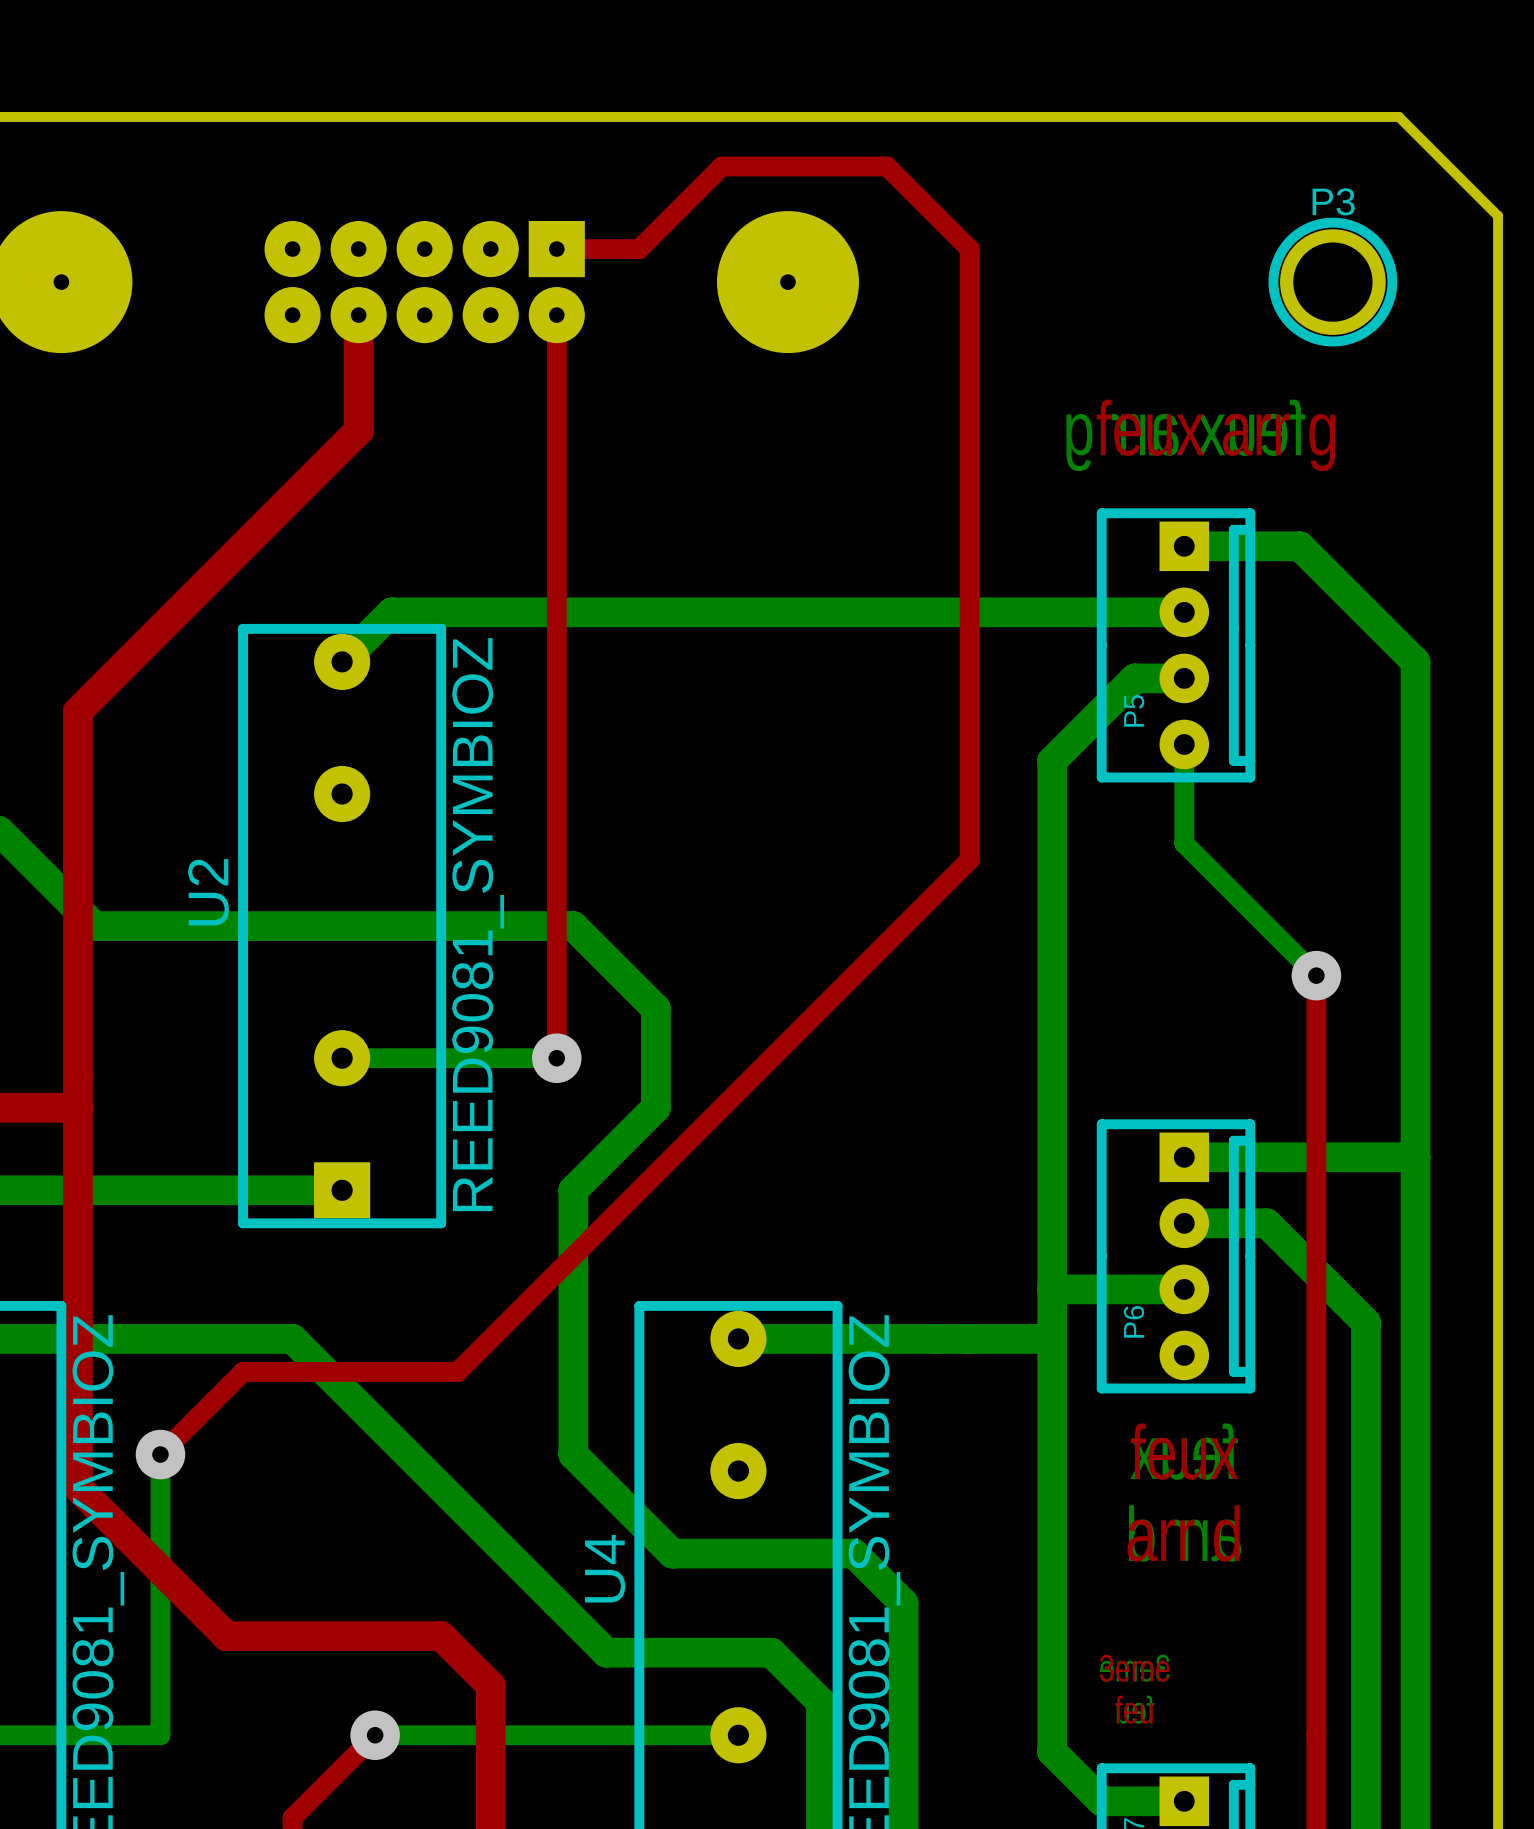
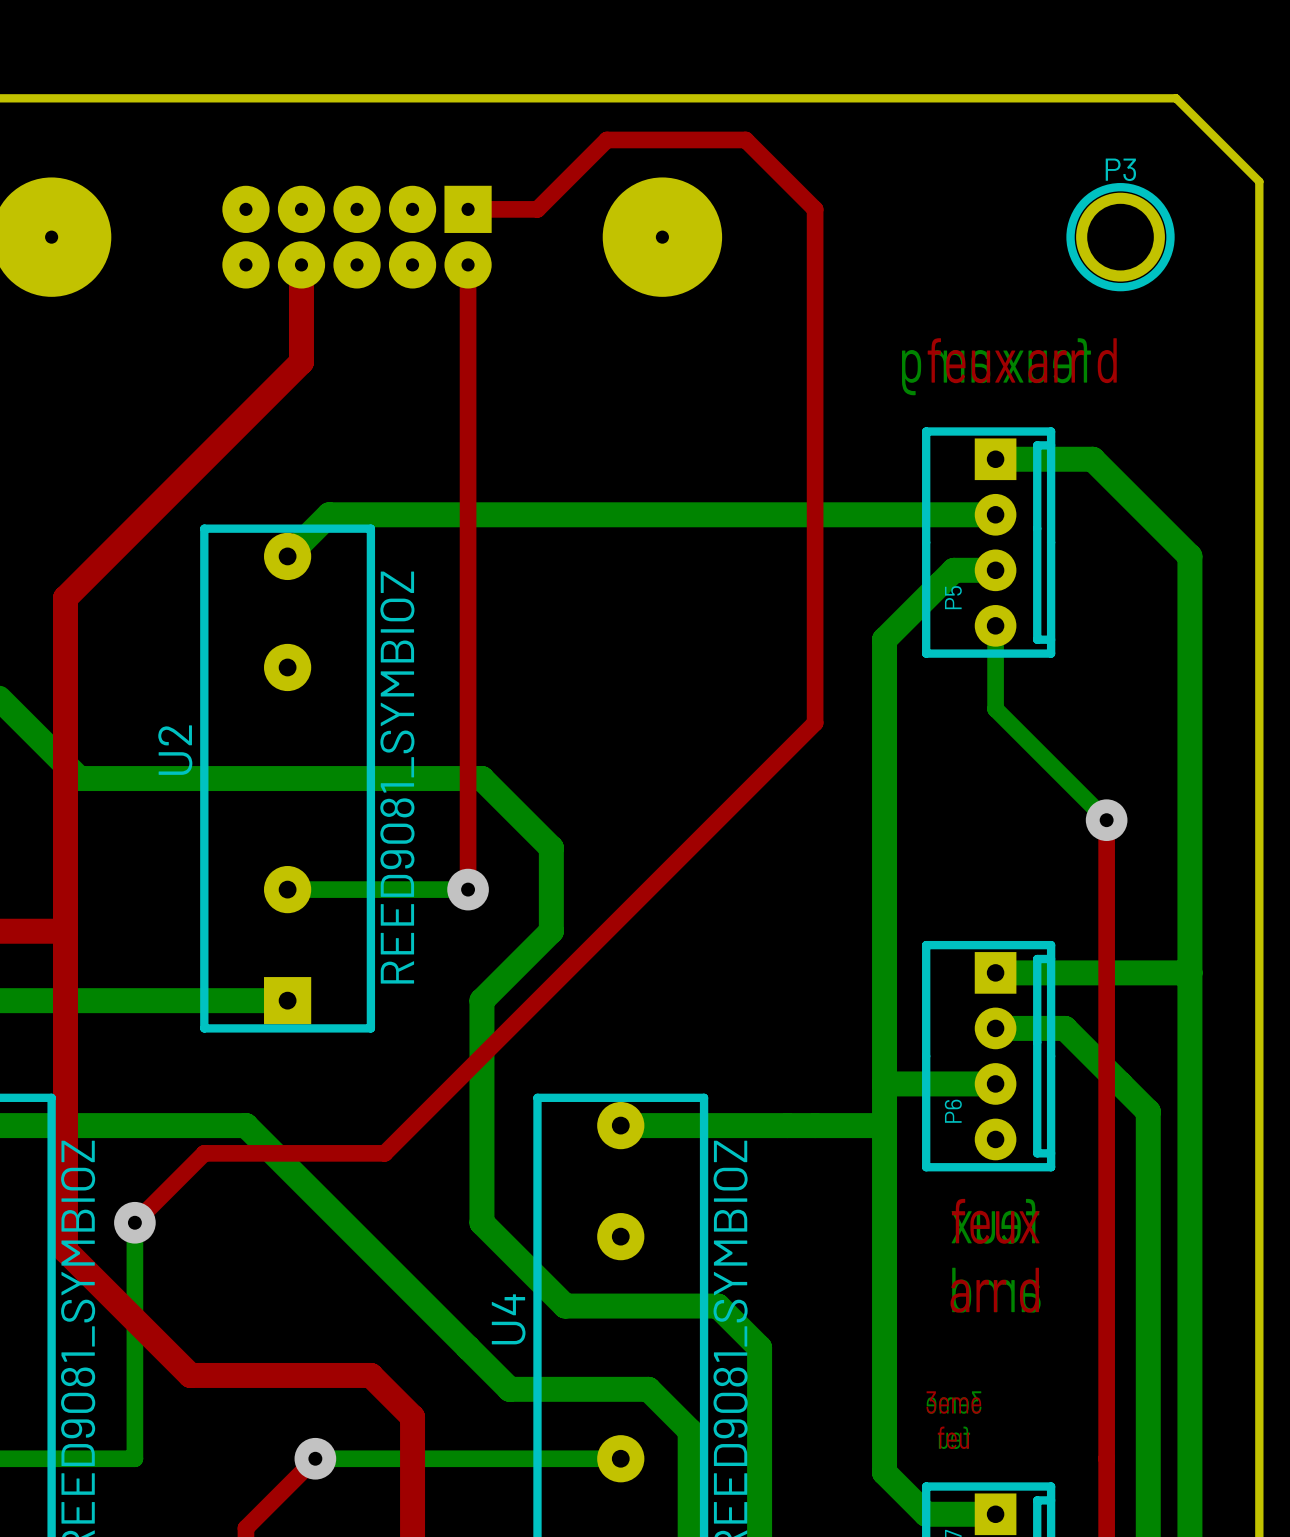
text: feux arr g (1215, 435) -> feux arr d (1022, 360)

